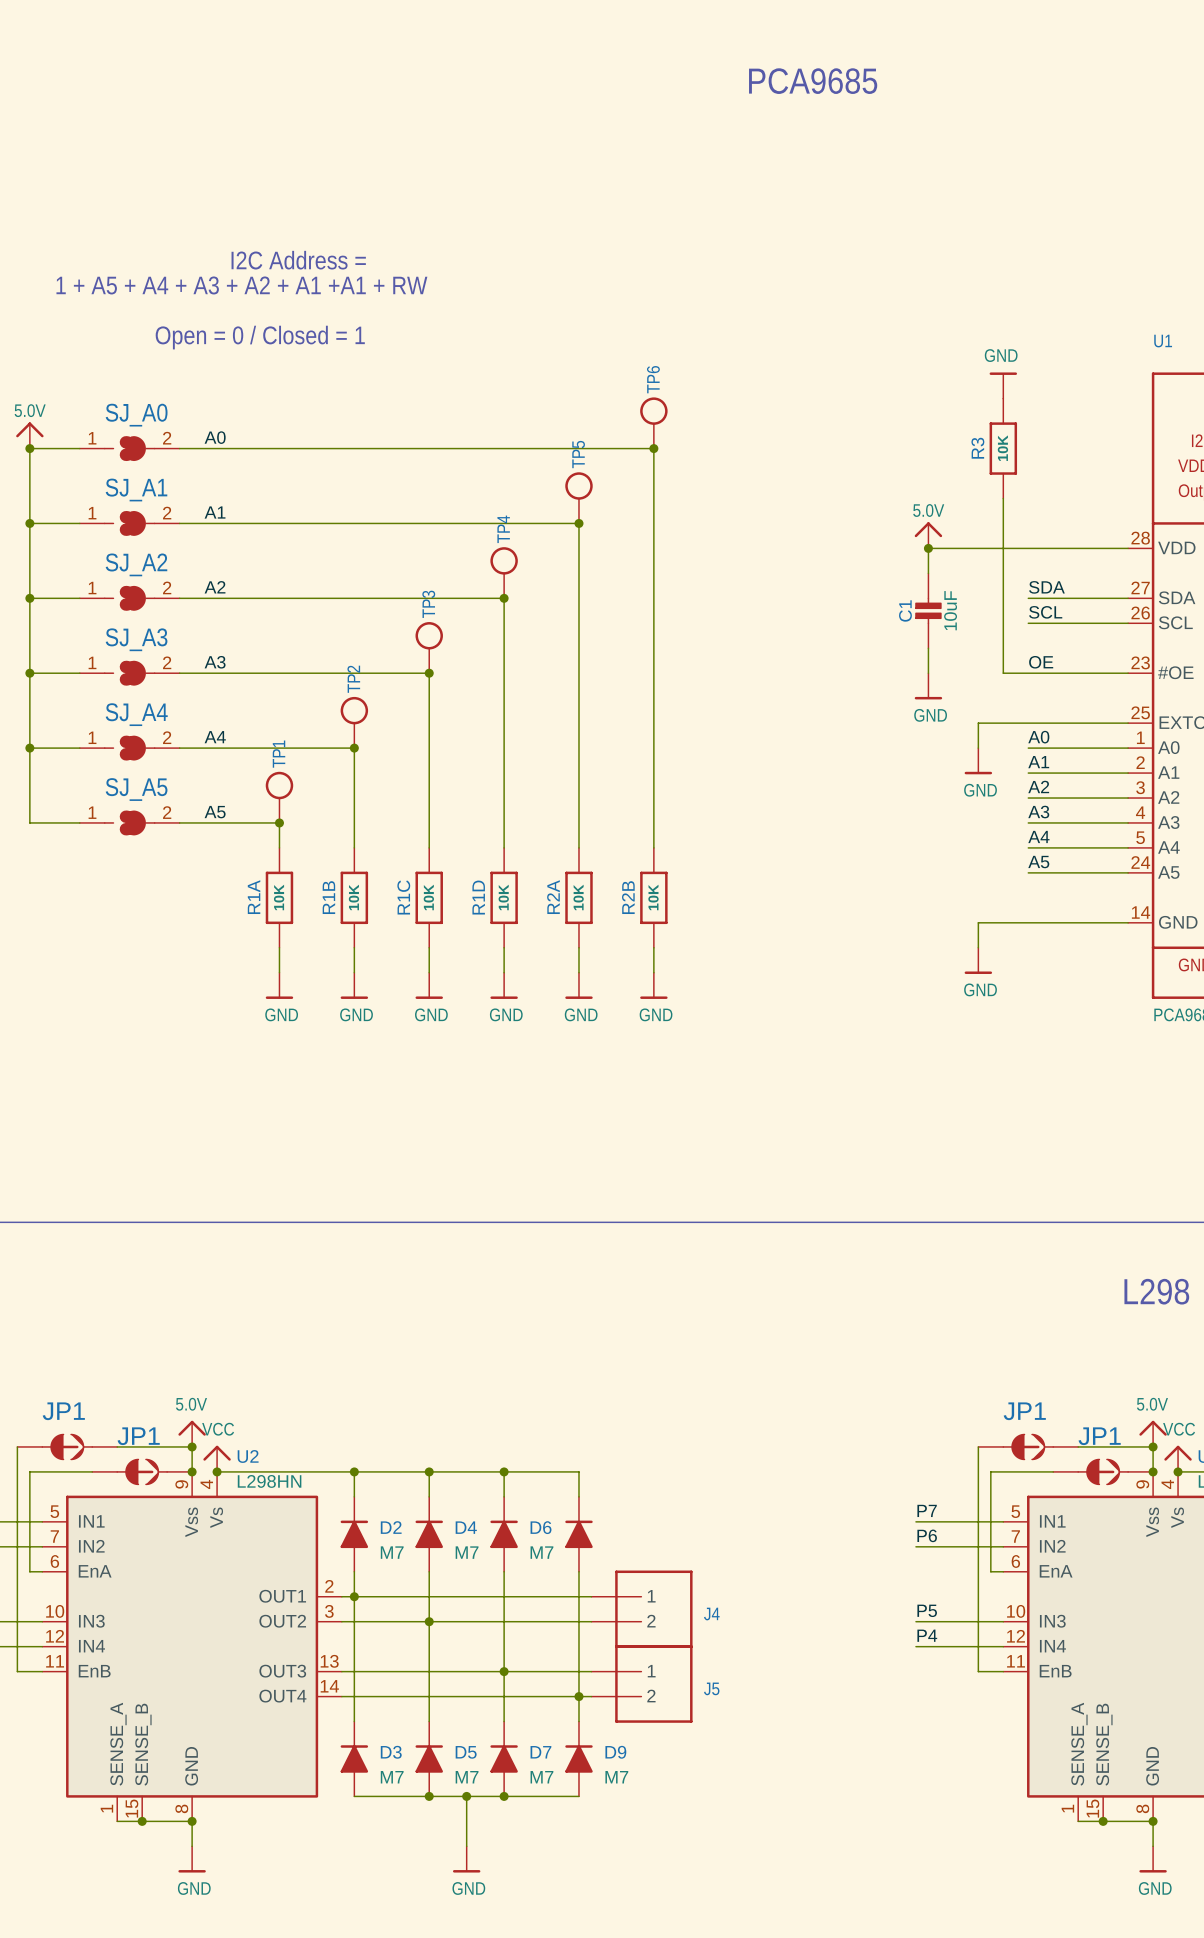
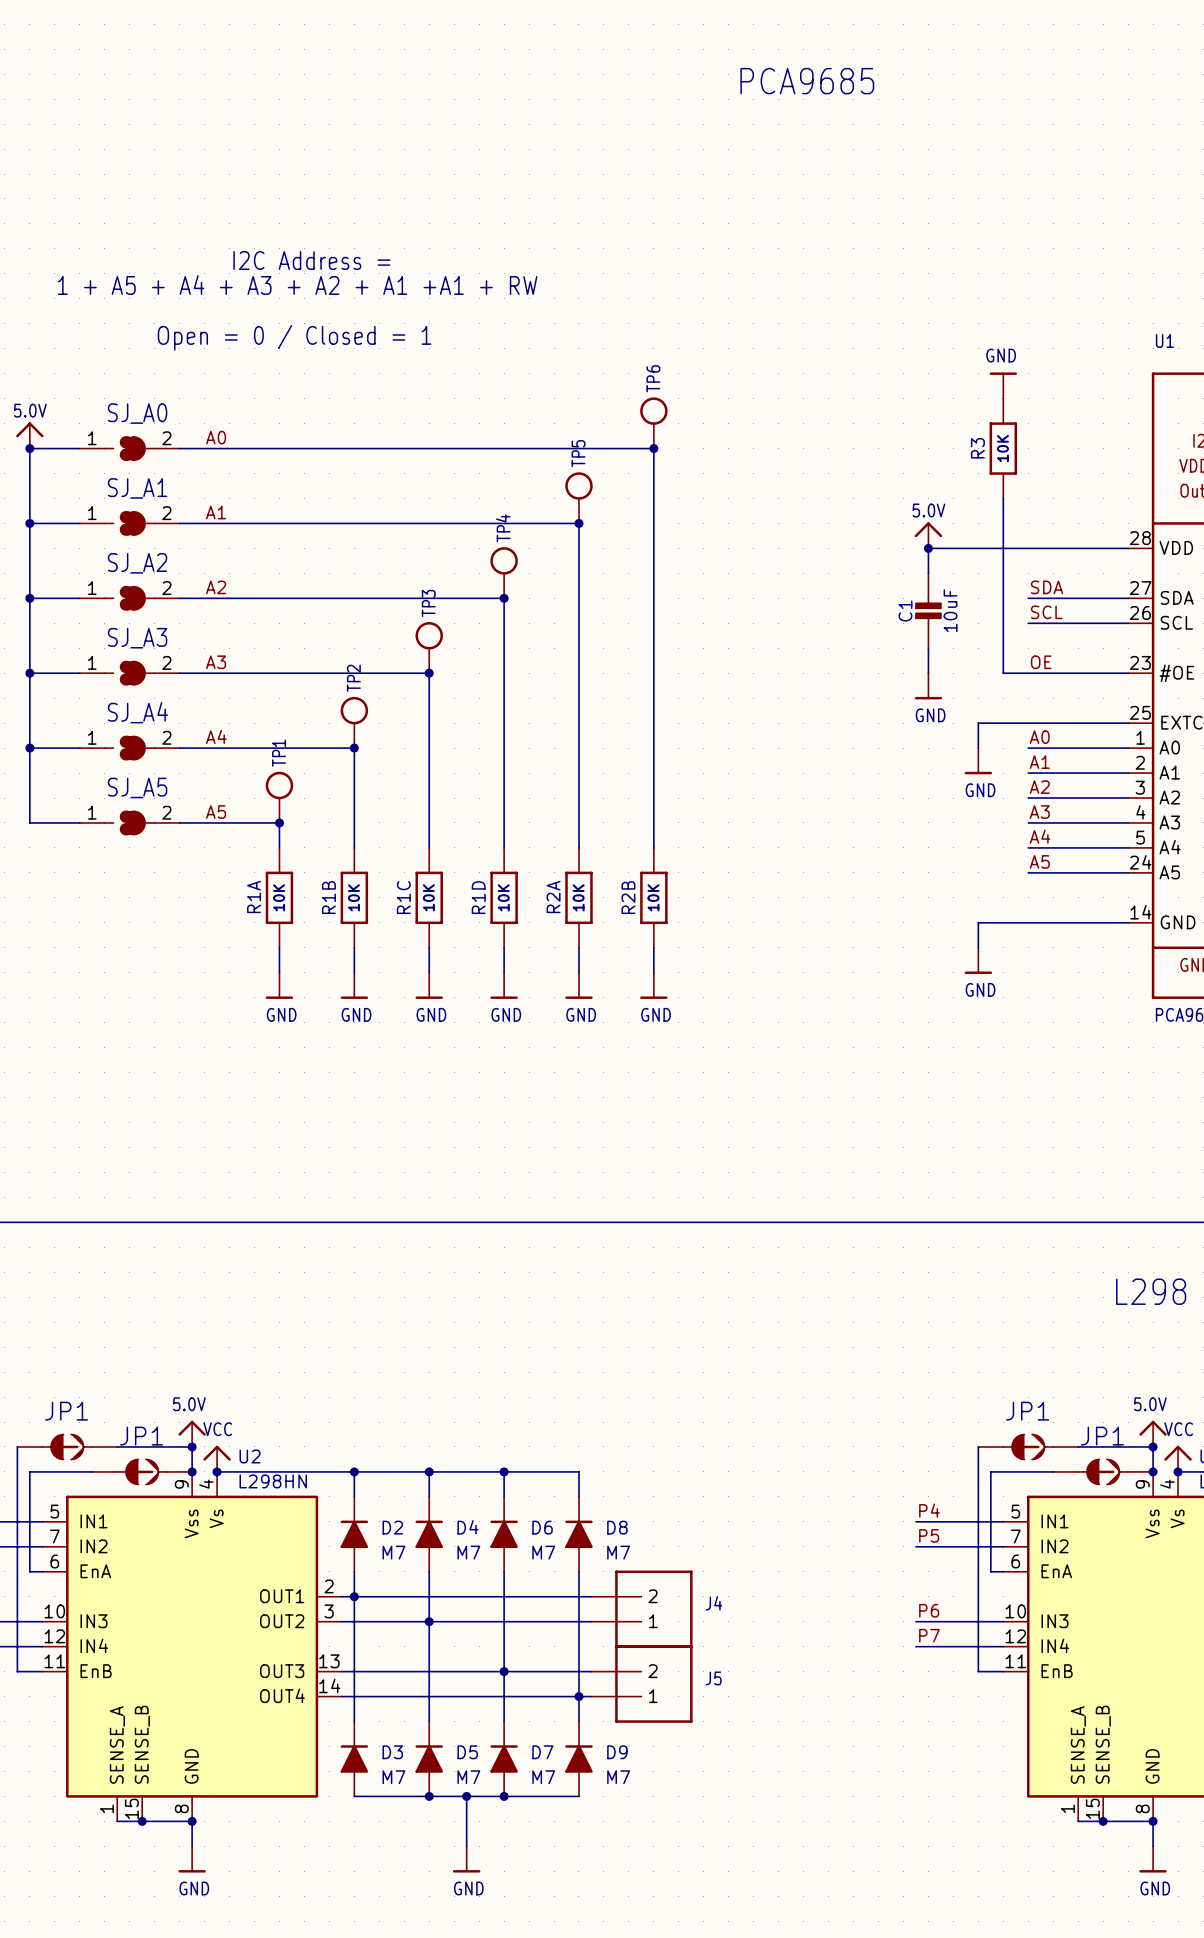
label: P7 (927, 1510) -> P4 (929, 1510)
D8 name: none -> D8 (617, 1527)
label: P6 (927, 1535) -> P5 (929, 1535)
D8 value: none -> M7 (618, 1552)
J4 flip: as is (653, 1609) -> up-down (653, 1609)
label: P5 (927, 1610) -> P6 (929, 1610)
label: P4 (927, 1635) -> P7 (929, 1635)
J5 flip: as is (653, 1684) -> up-down (653, 1684)

